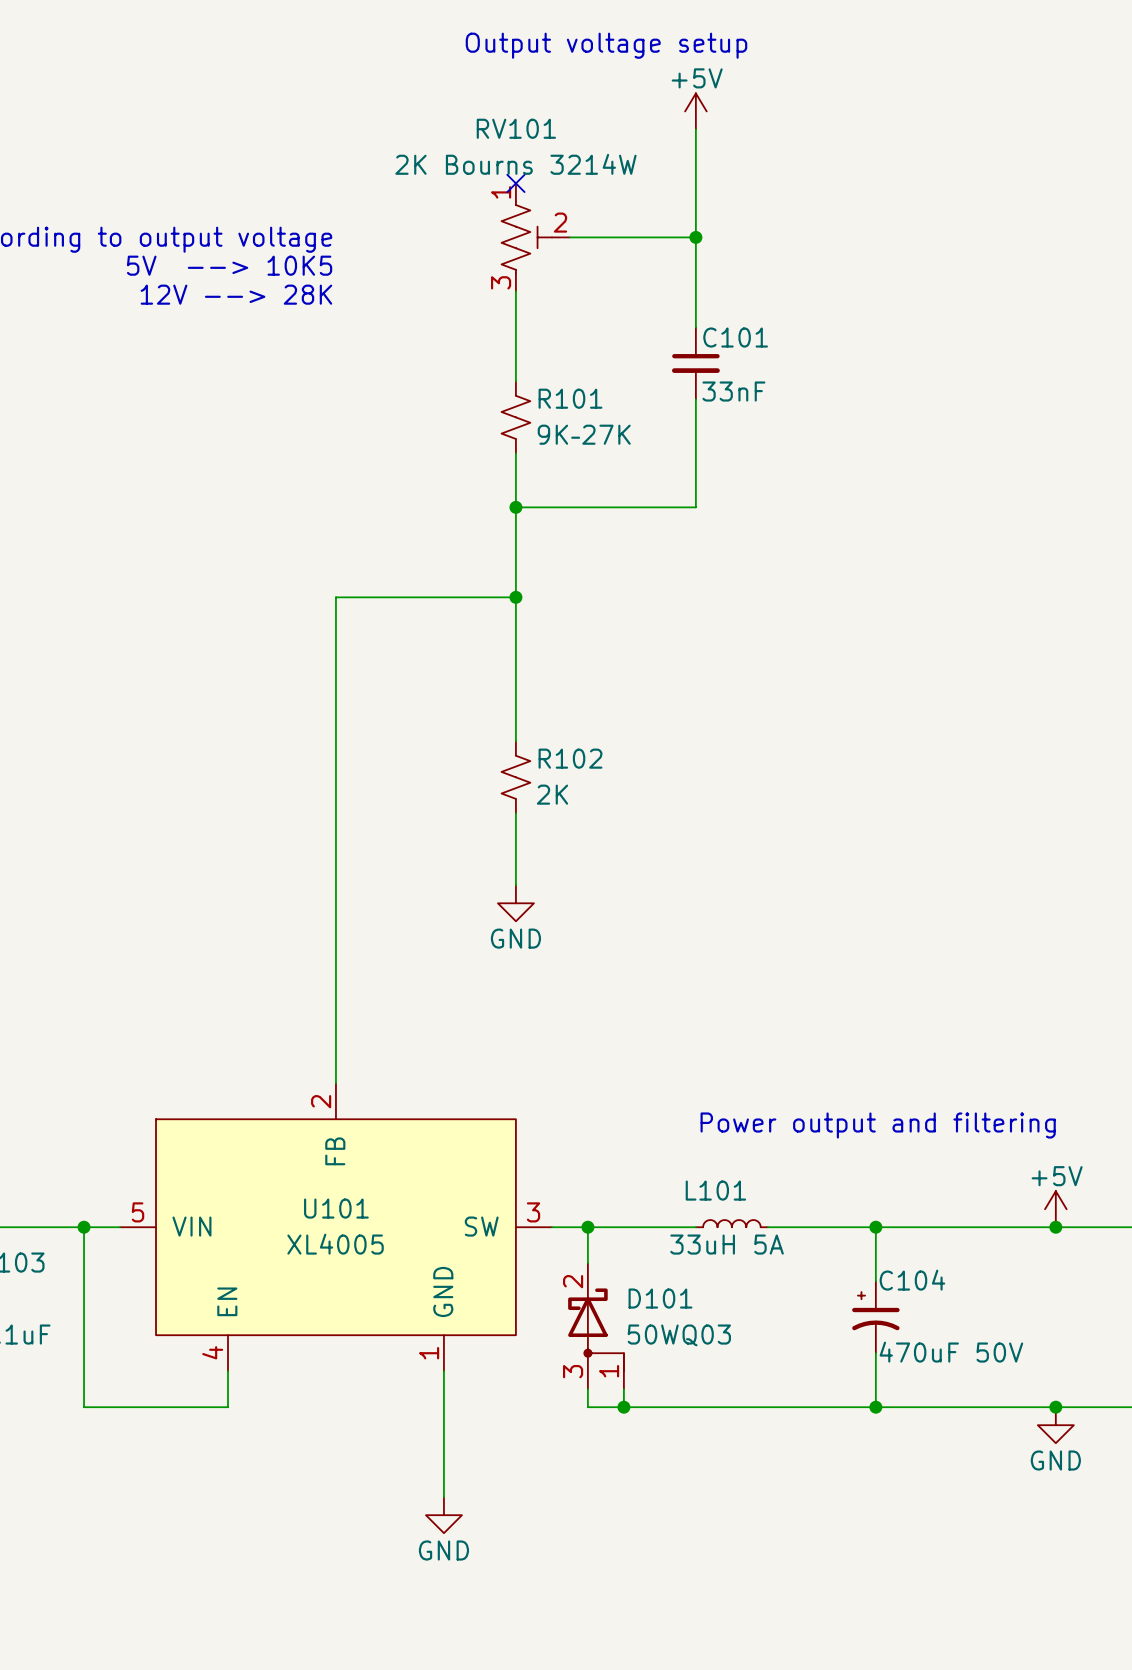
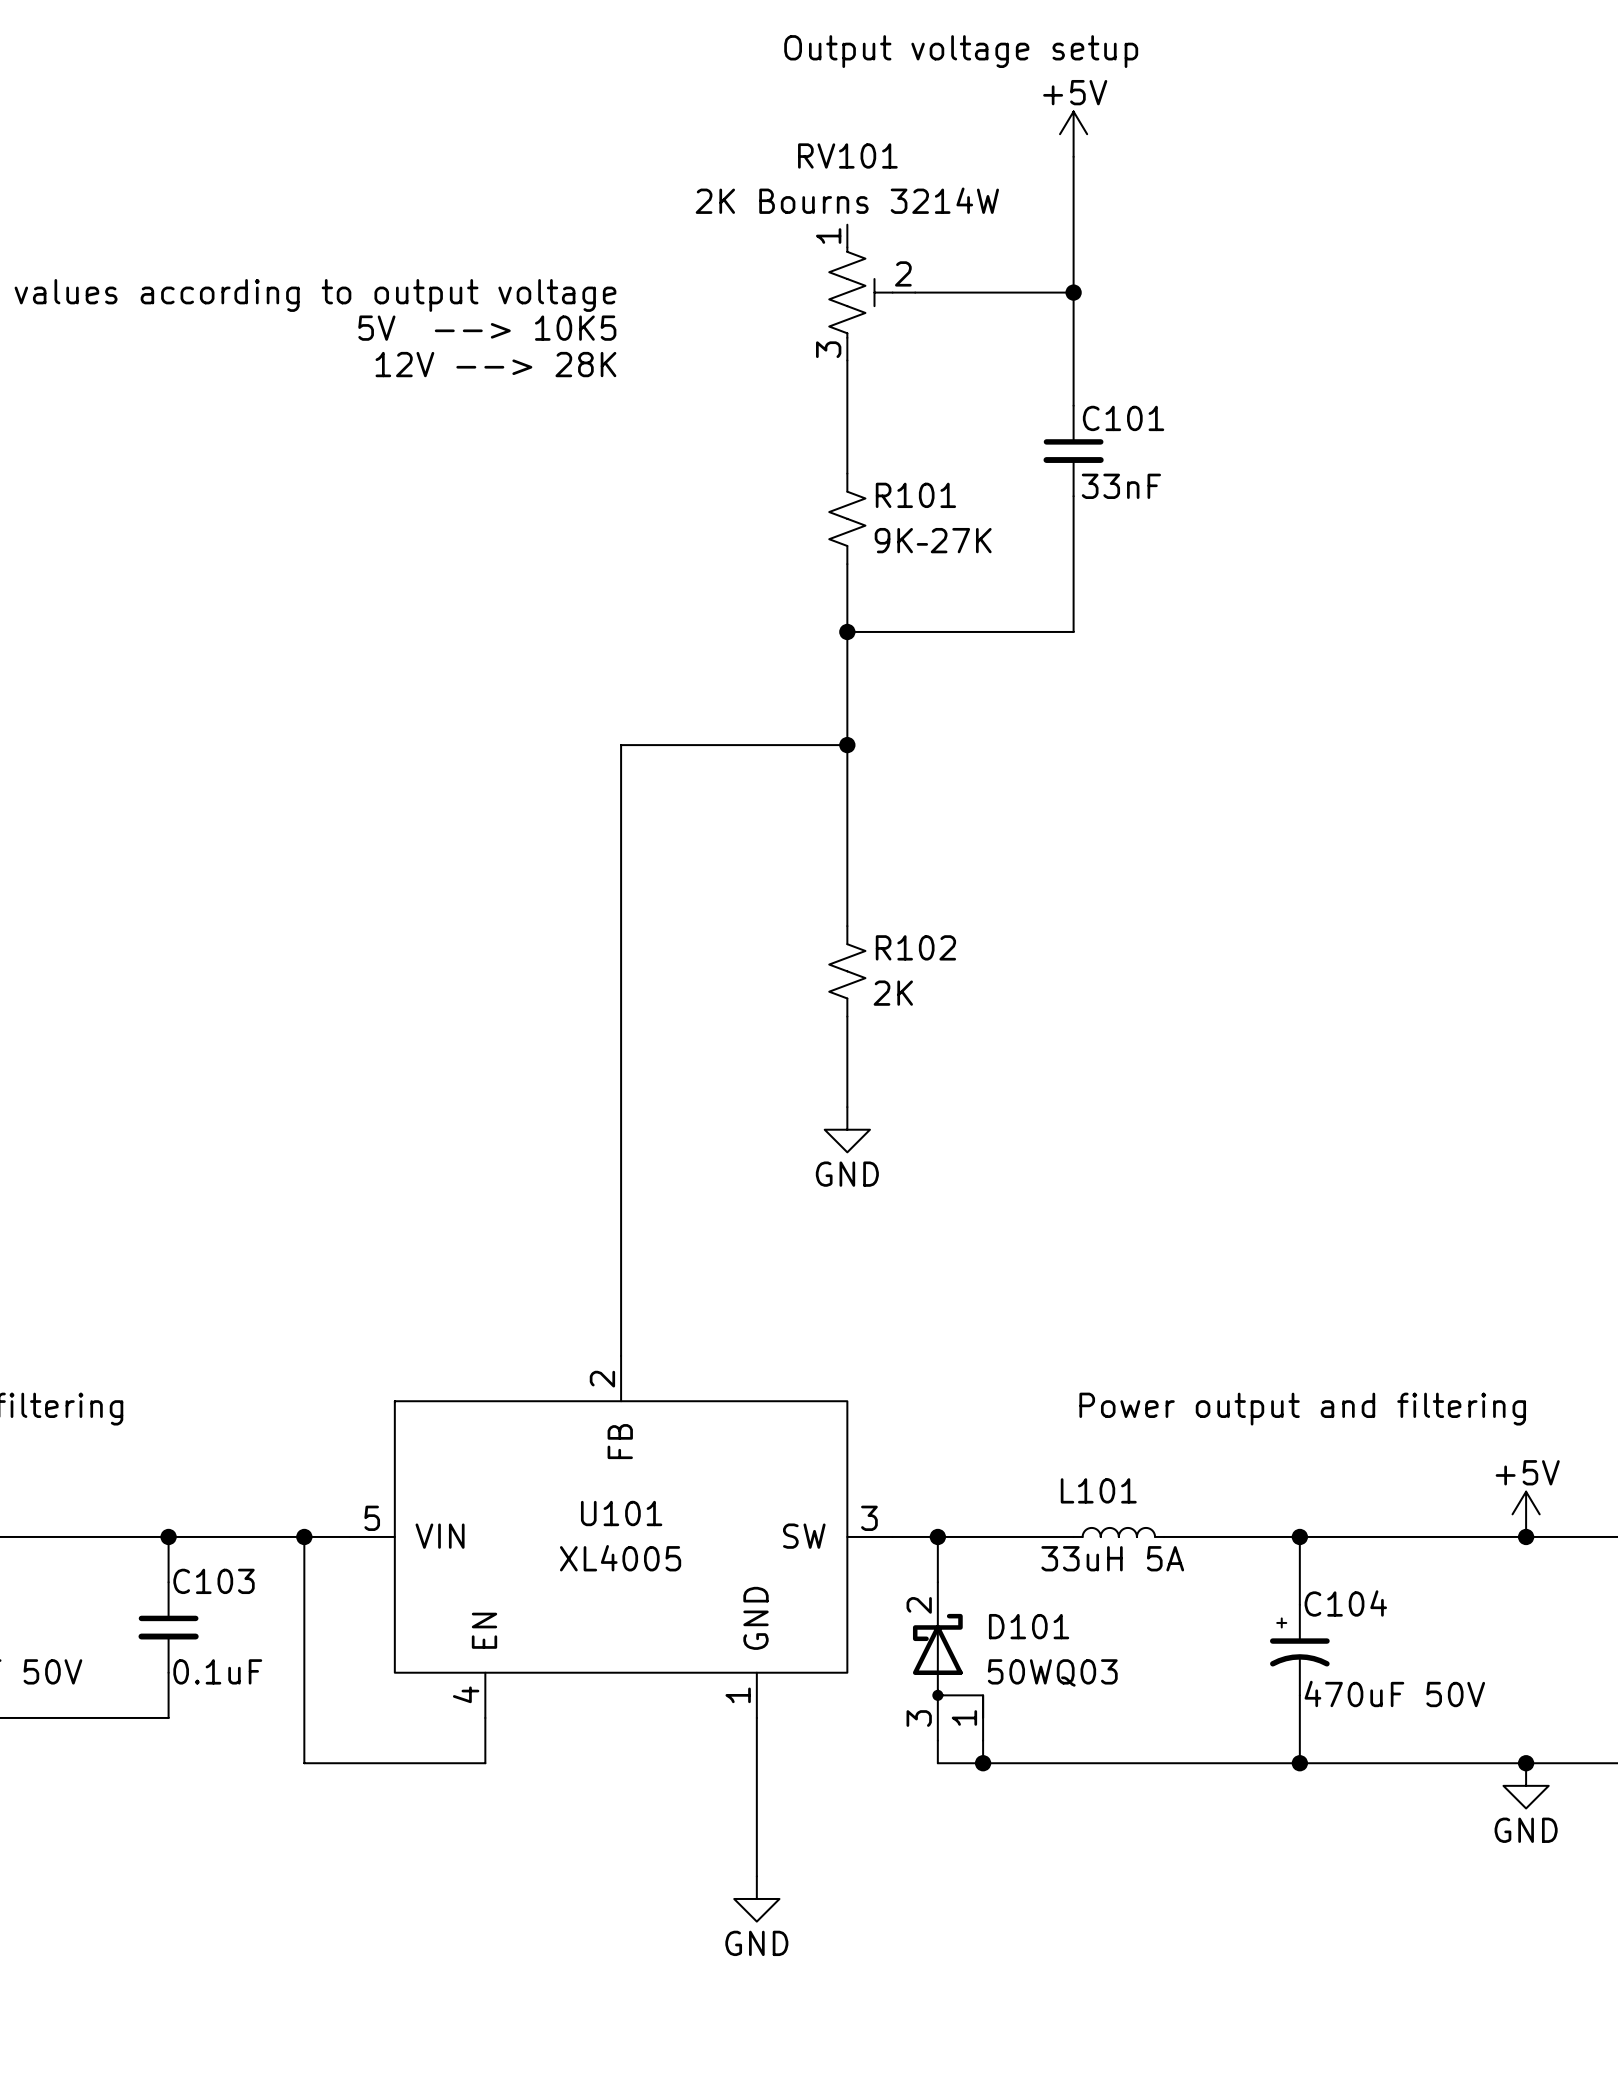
no-connect mark: (515, 183) -> none

